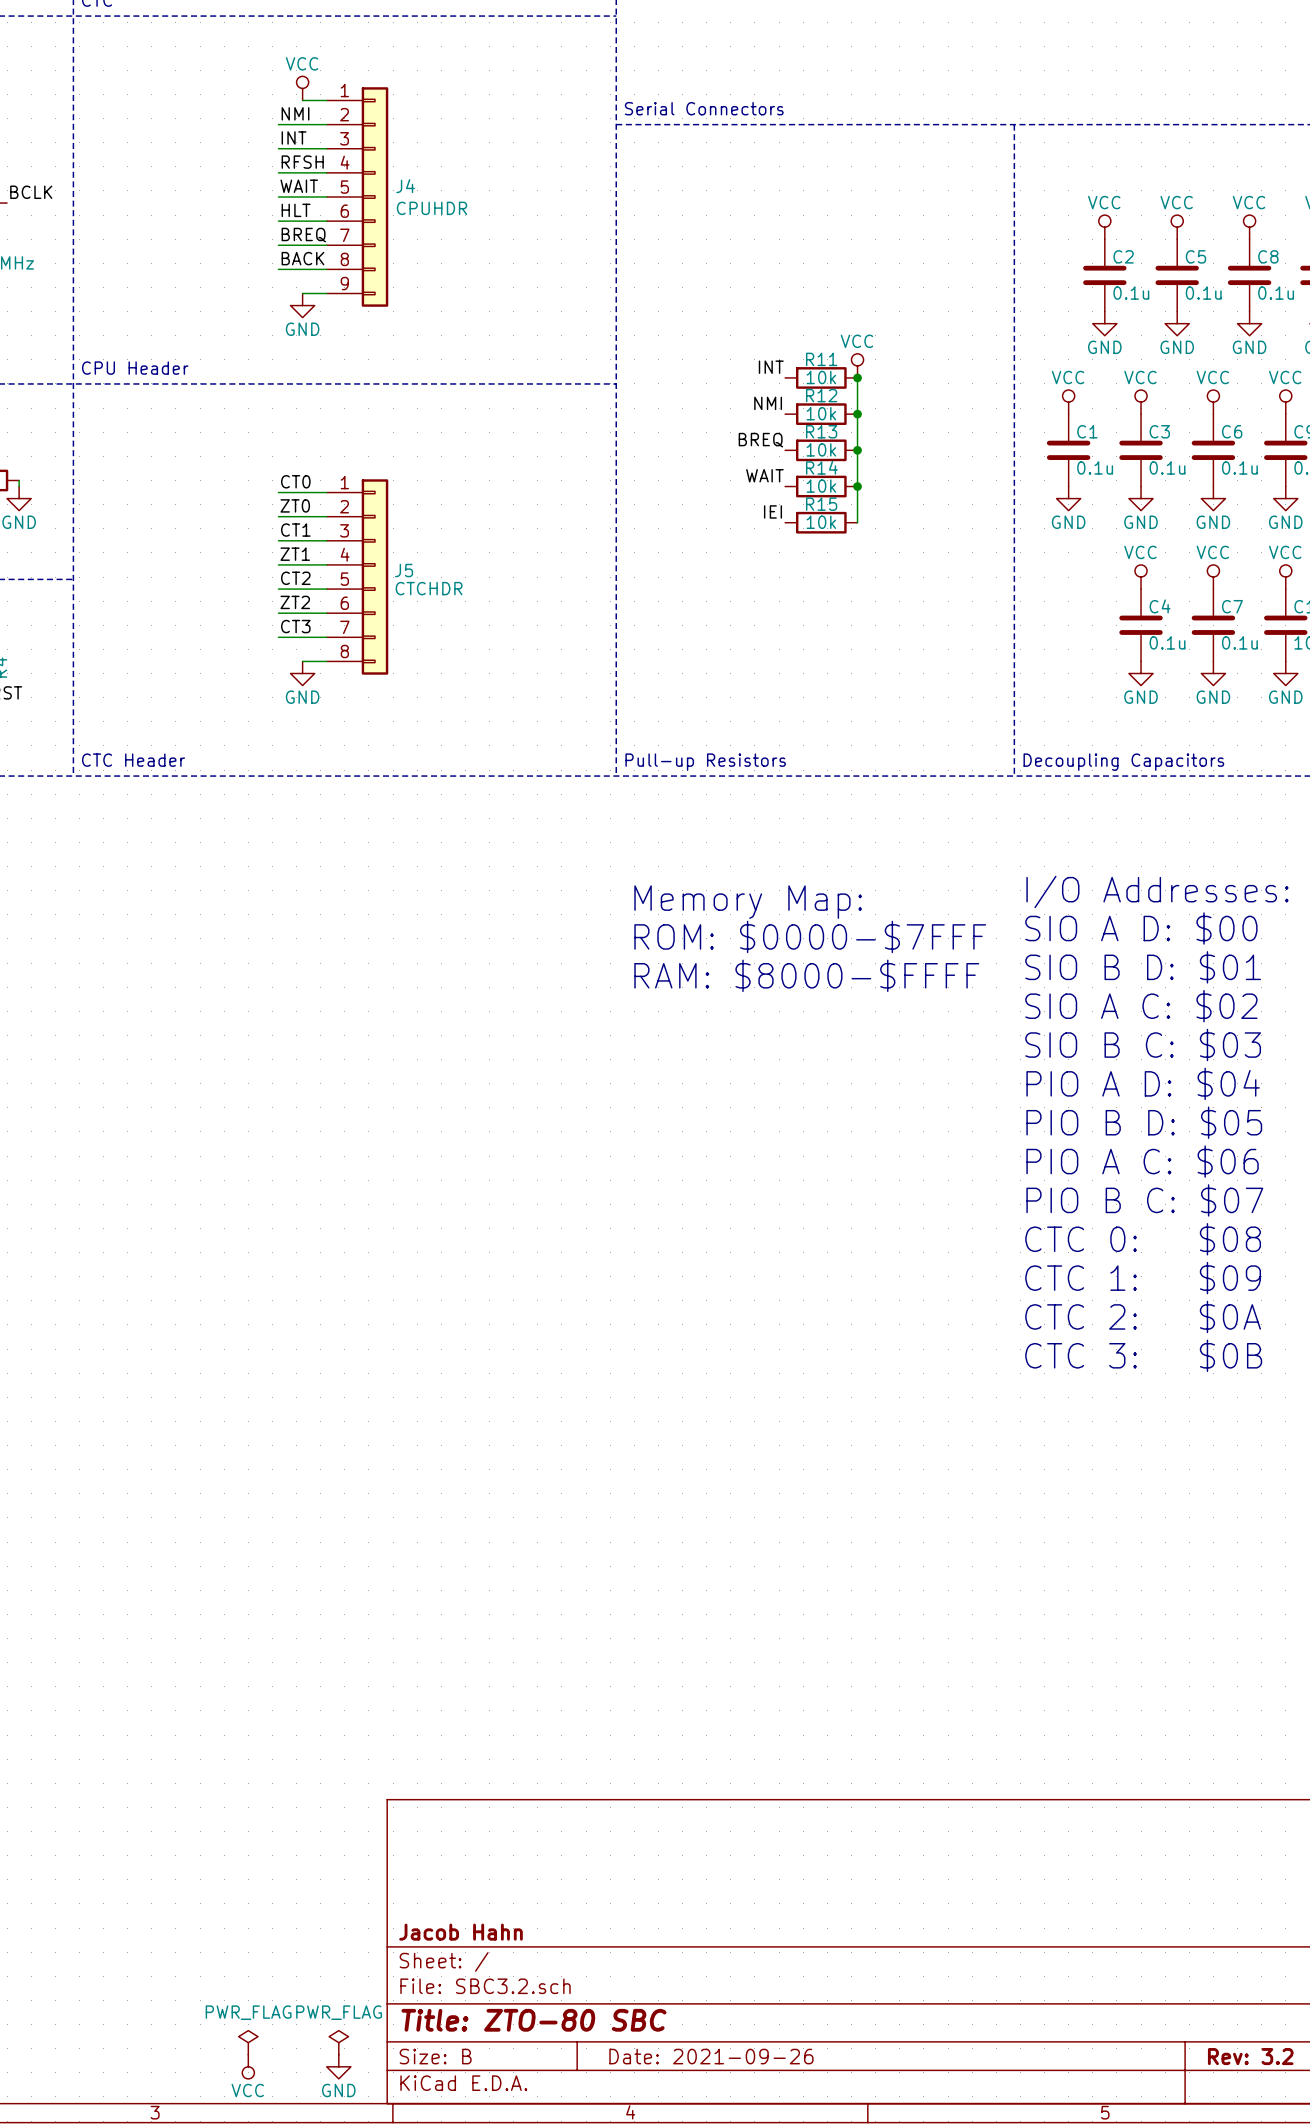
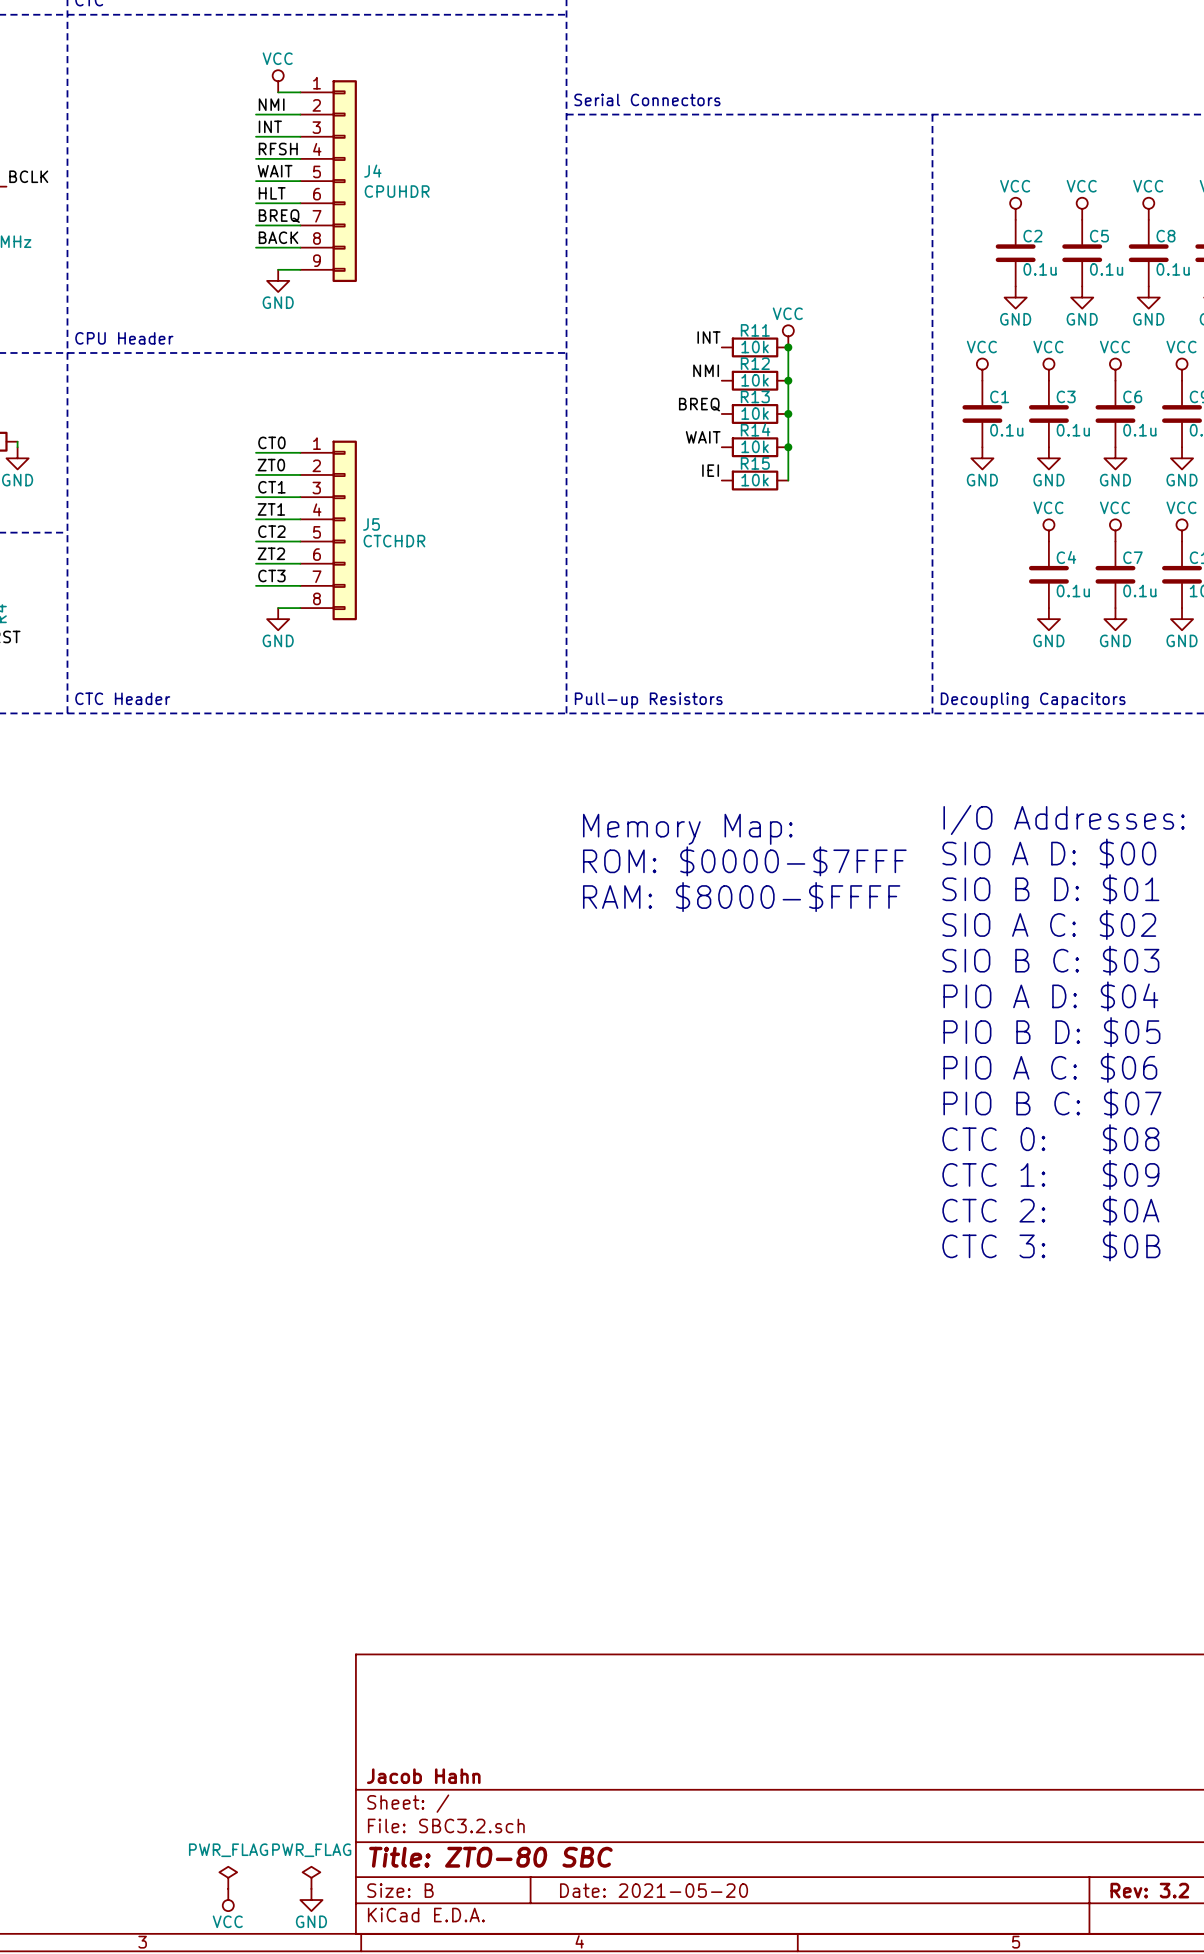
title block: Date: 2021-09-26 (711, 2056) -> Date: 2021-05-20 (654, 1890)

